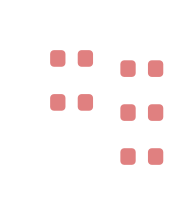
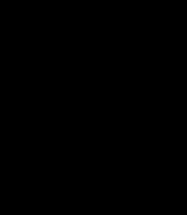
part: (71, 58) -> none
part: (141, 68) -> none
part: (71, 102) -> none
part: (141, 112) -> none
part: (141, 156) -> none

